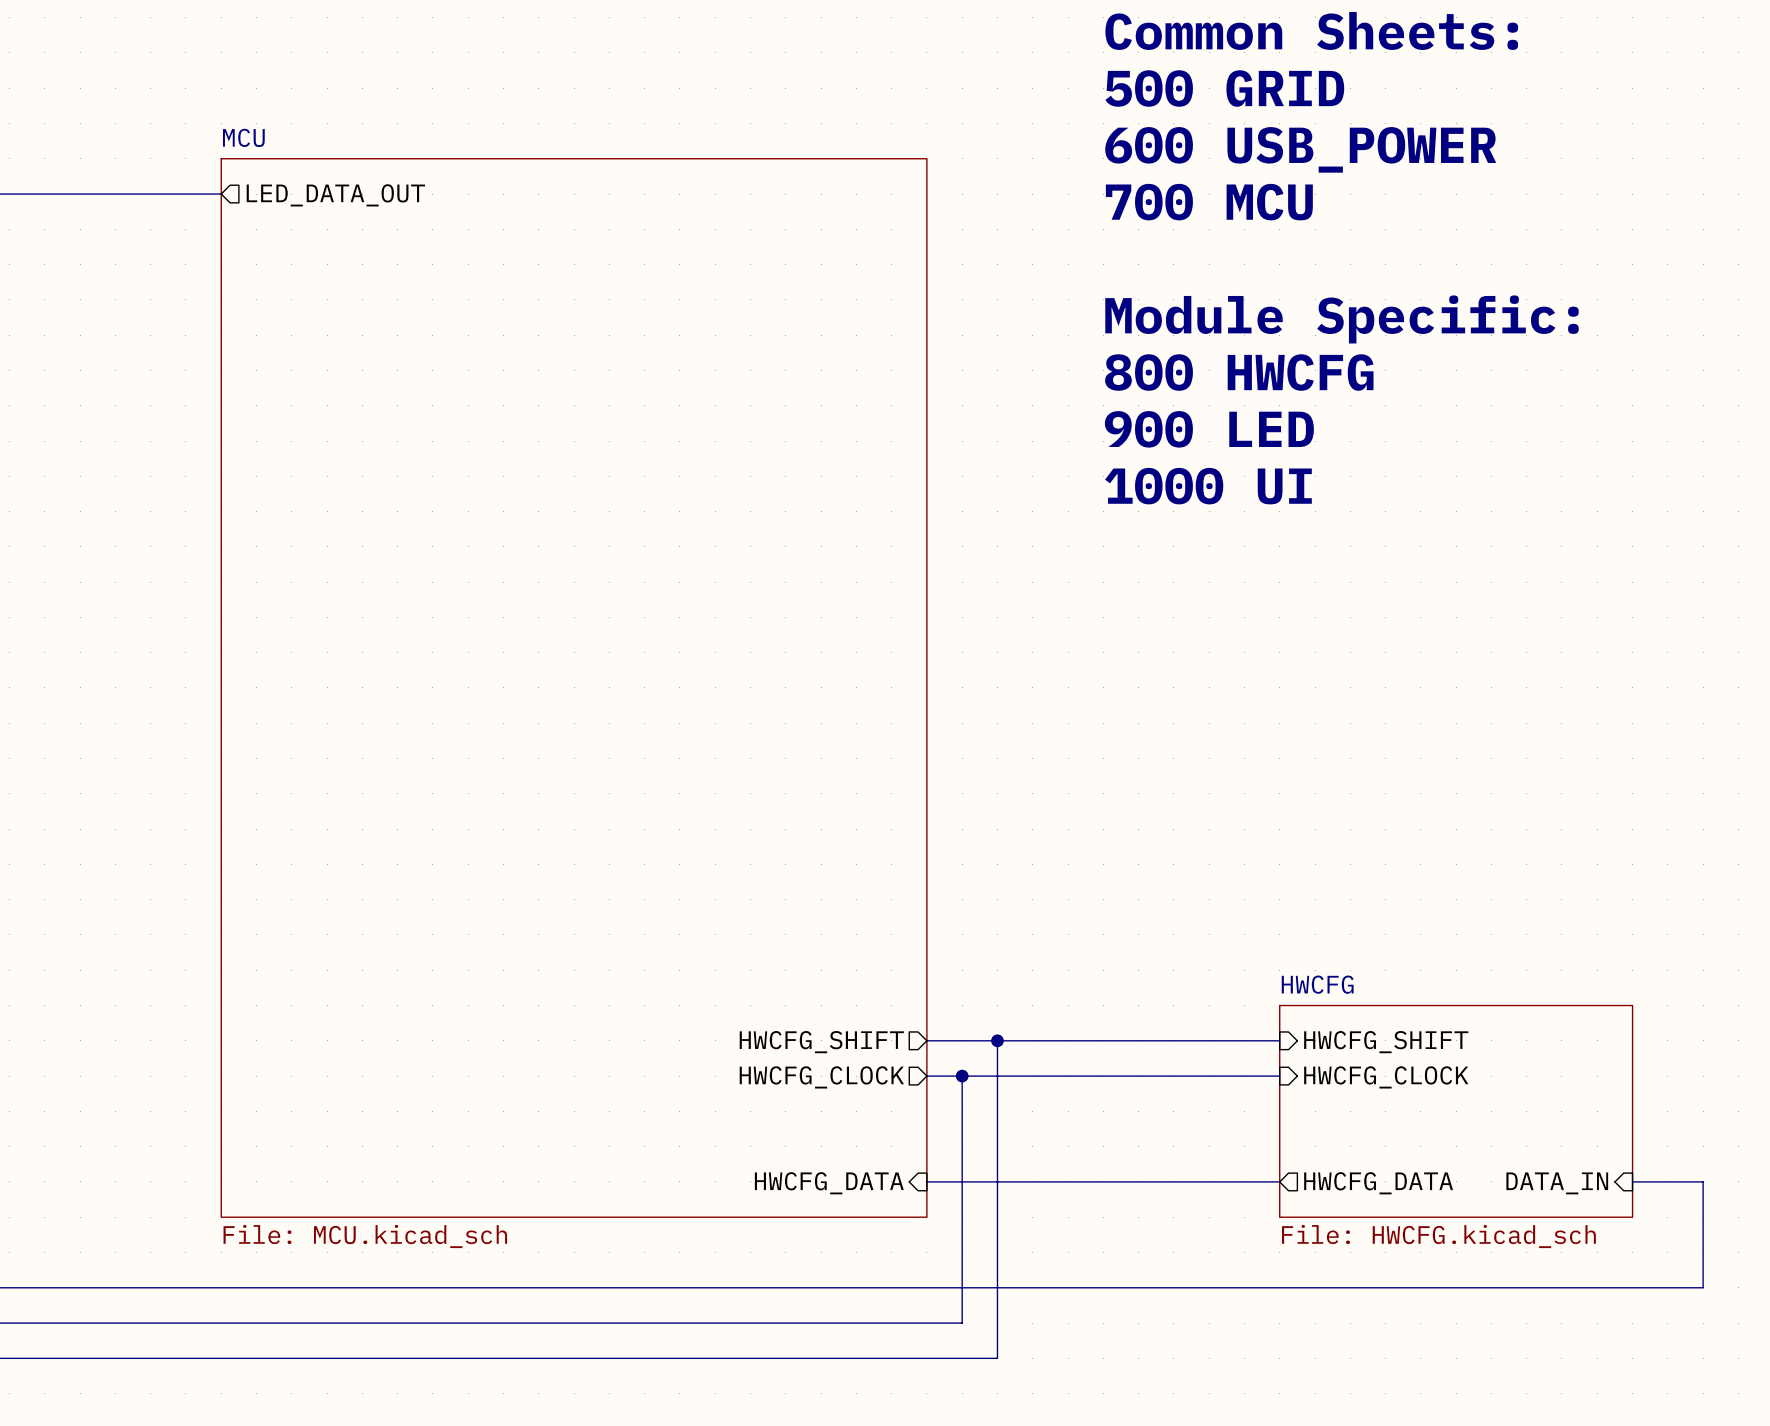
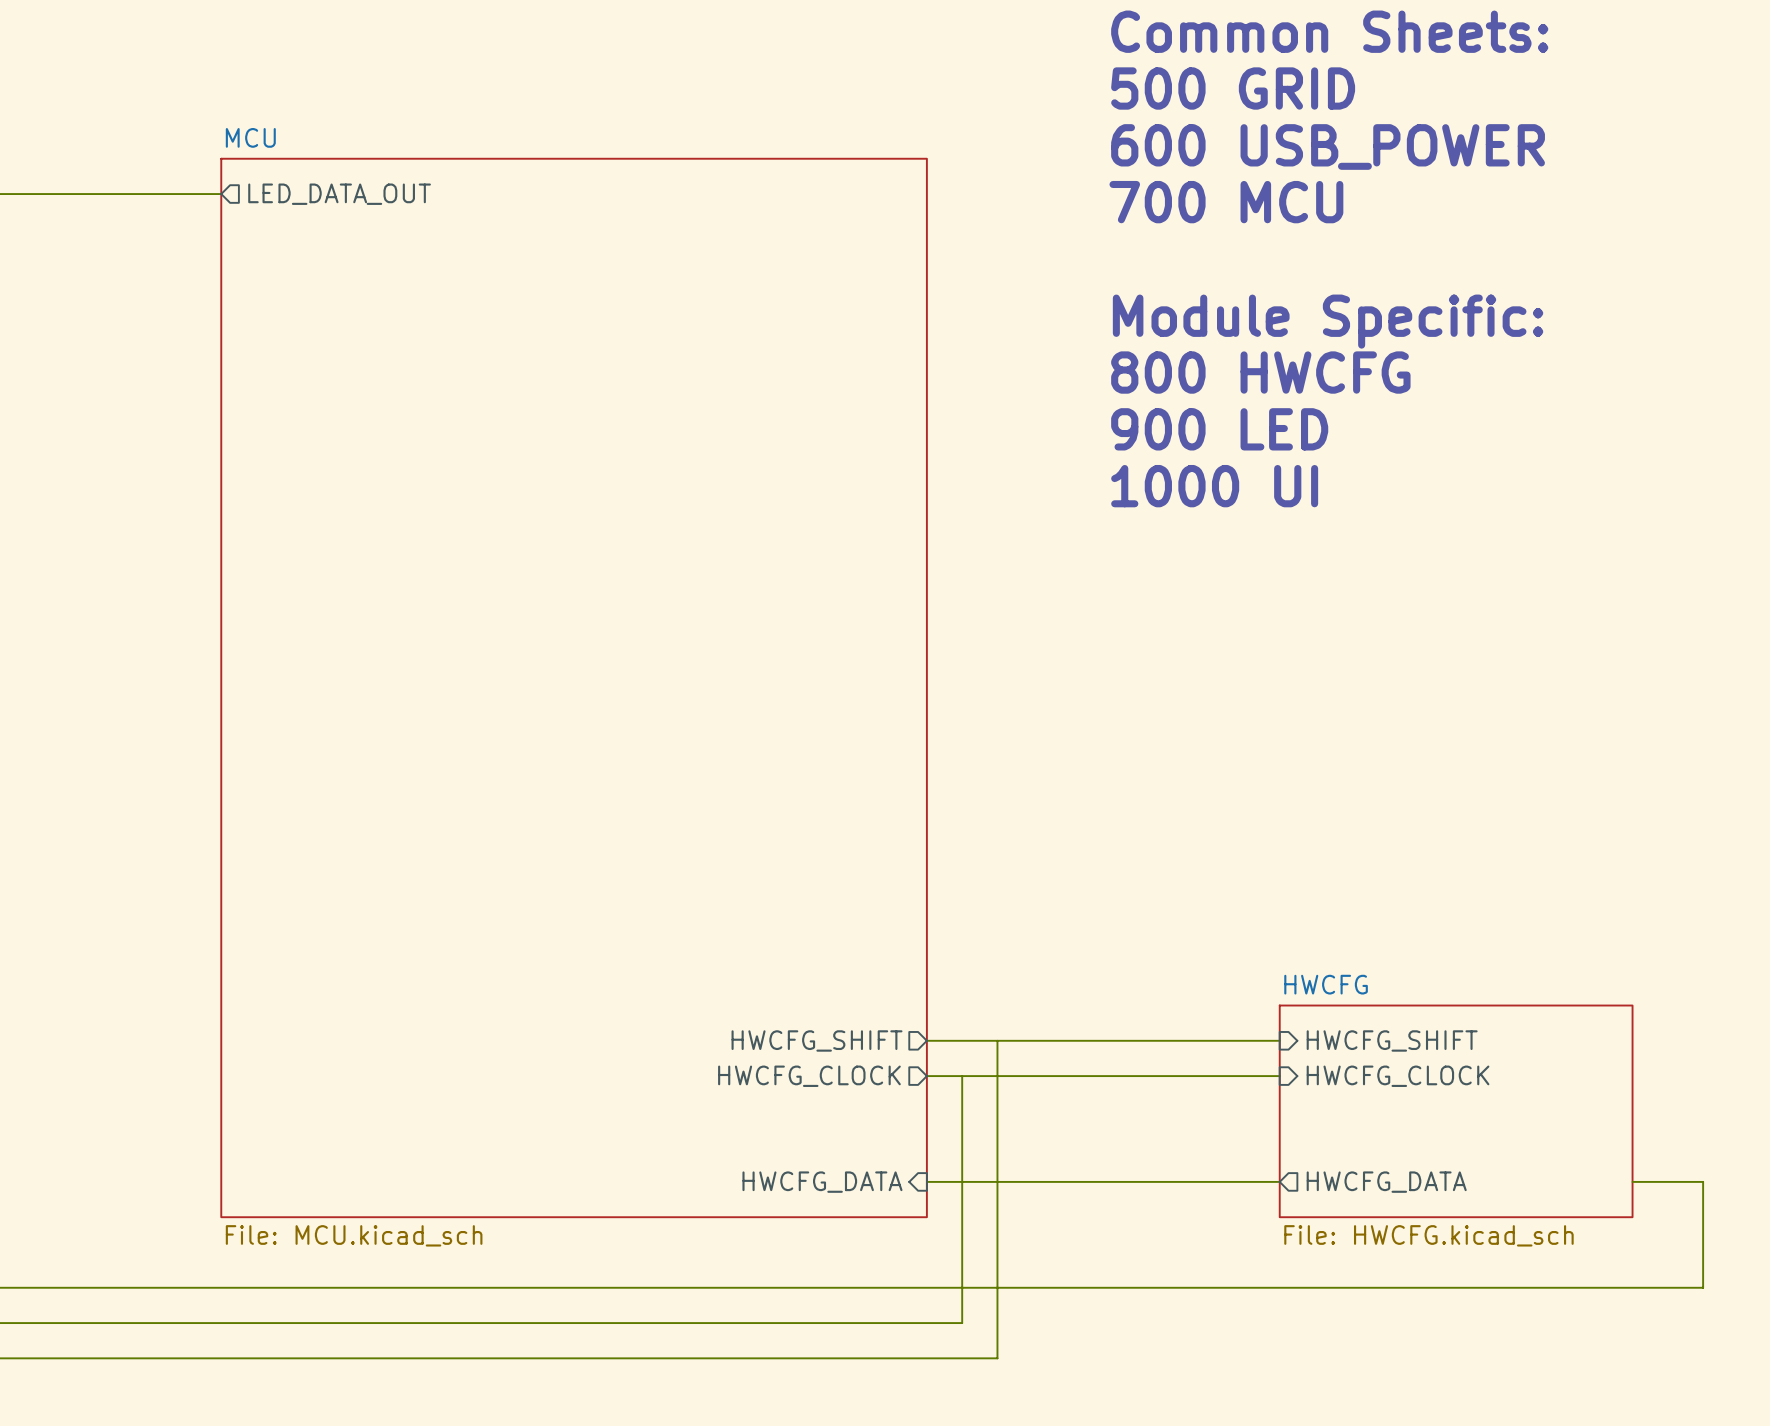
junction: (997, 1040) -> none
junction: (962, 1076) -> none
sheet pin: DATA_IN (1557, 1183) -> none

